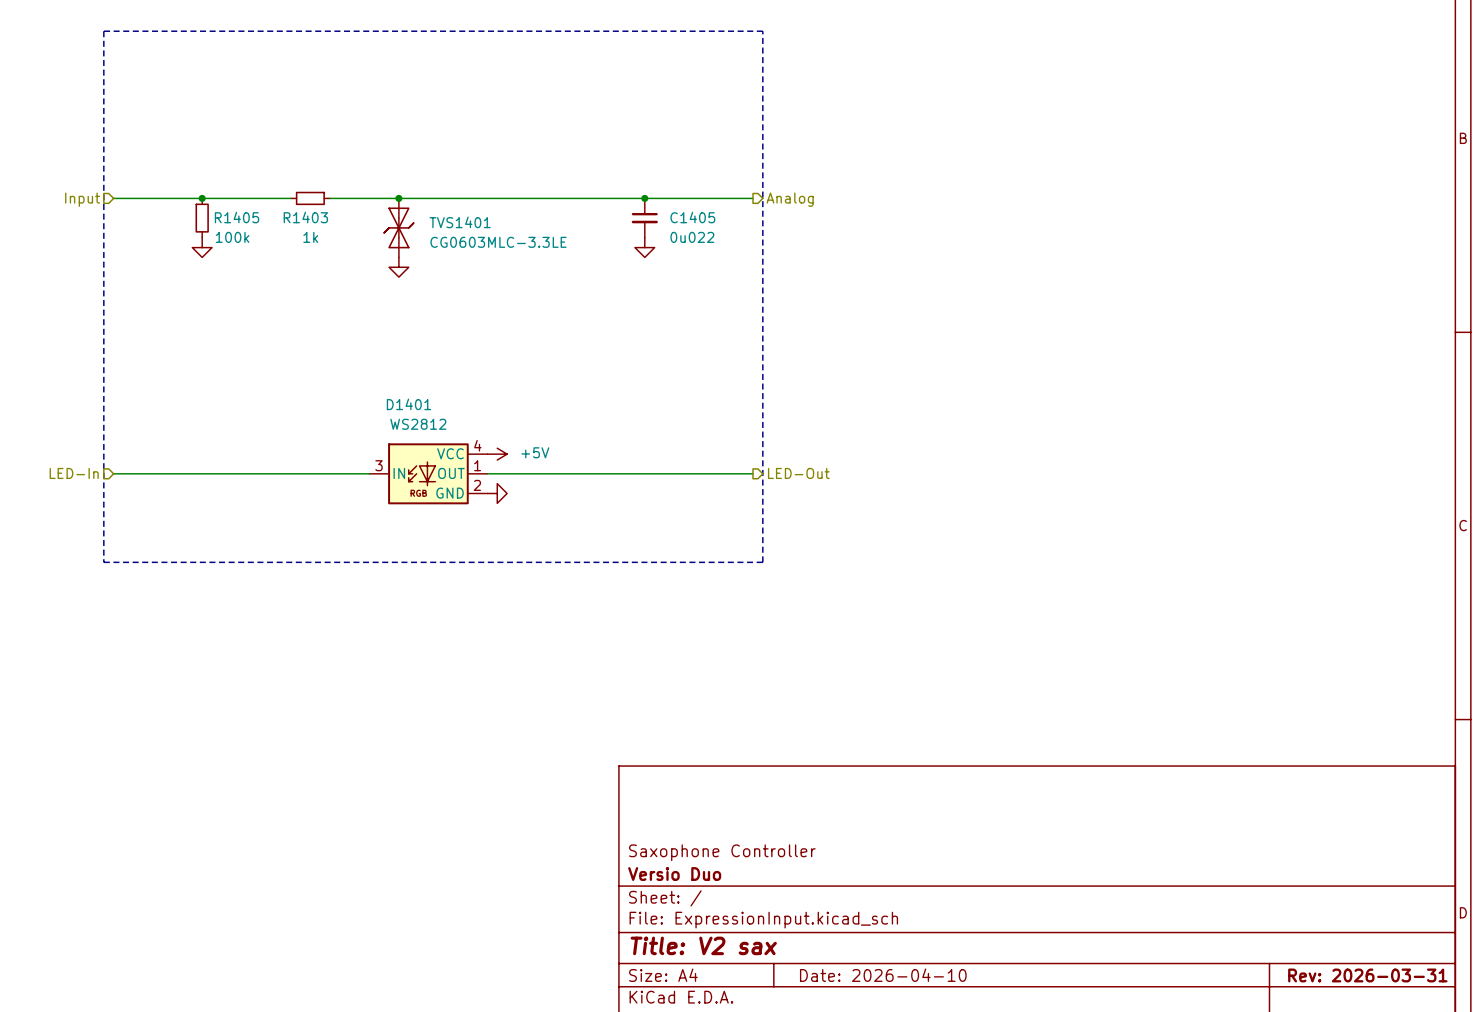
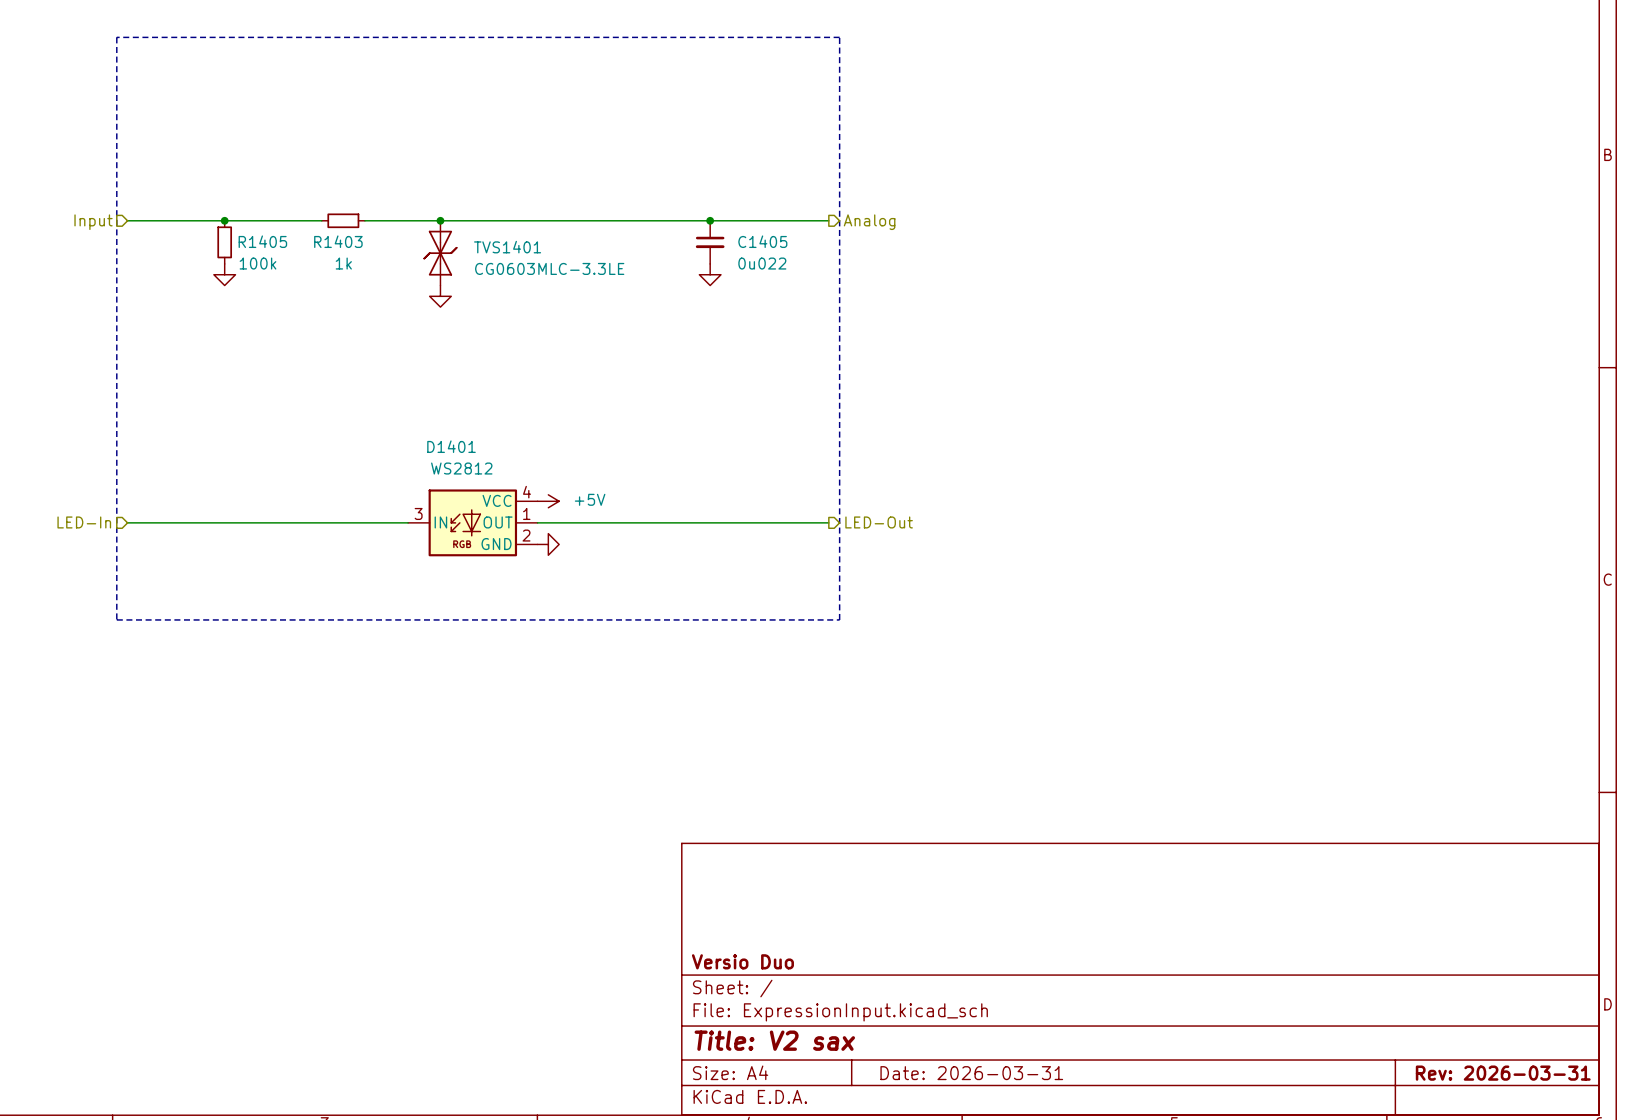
title block: Saxophone Controller (722, 852) -> none
title block: Date: 2026-04-10 (883, 975) -> Date: 2026-03-31 (971, 1073)

